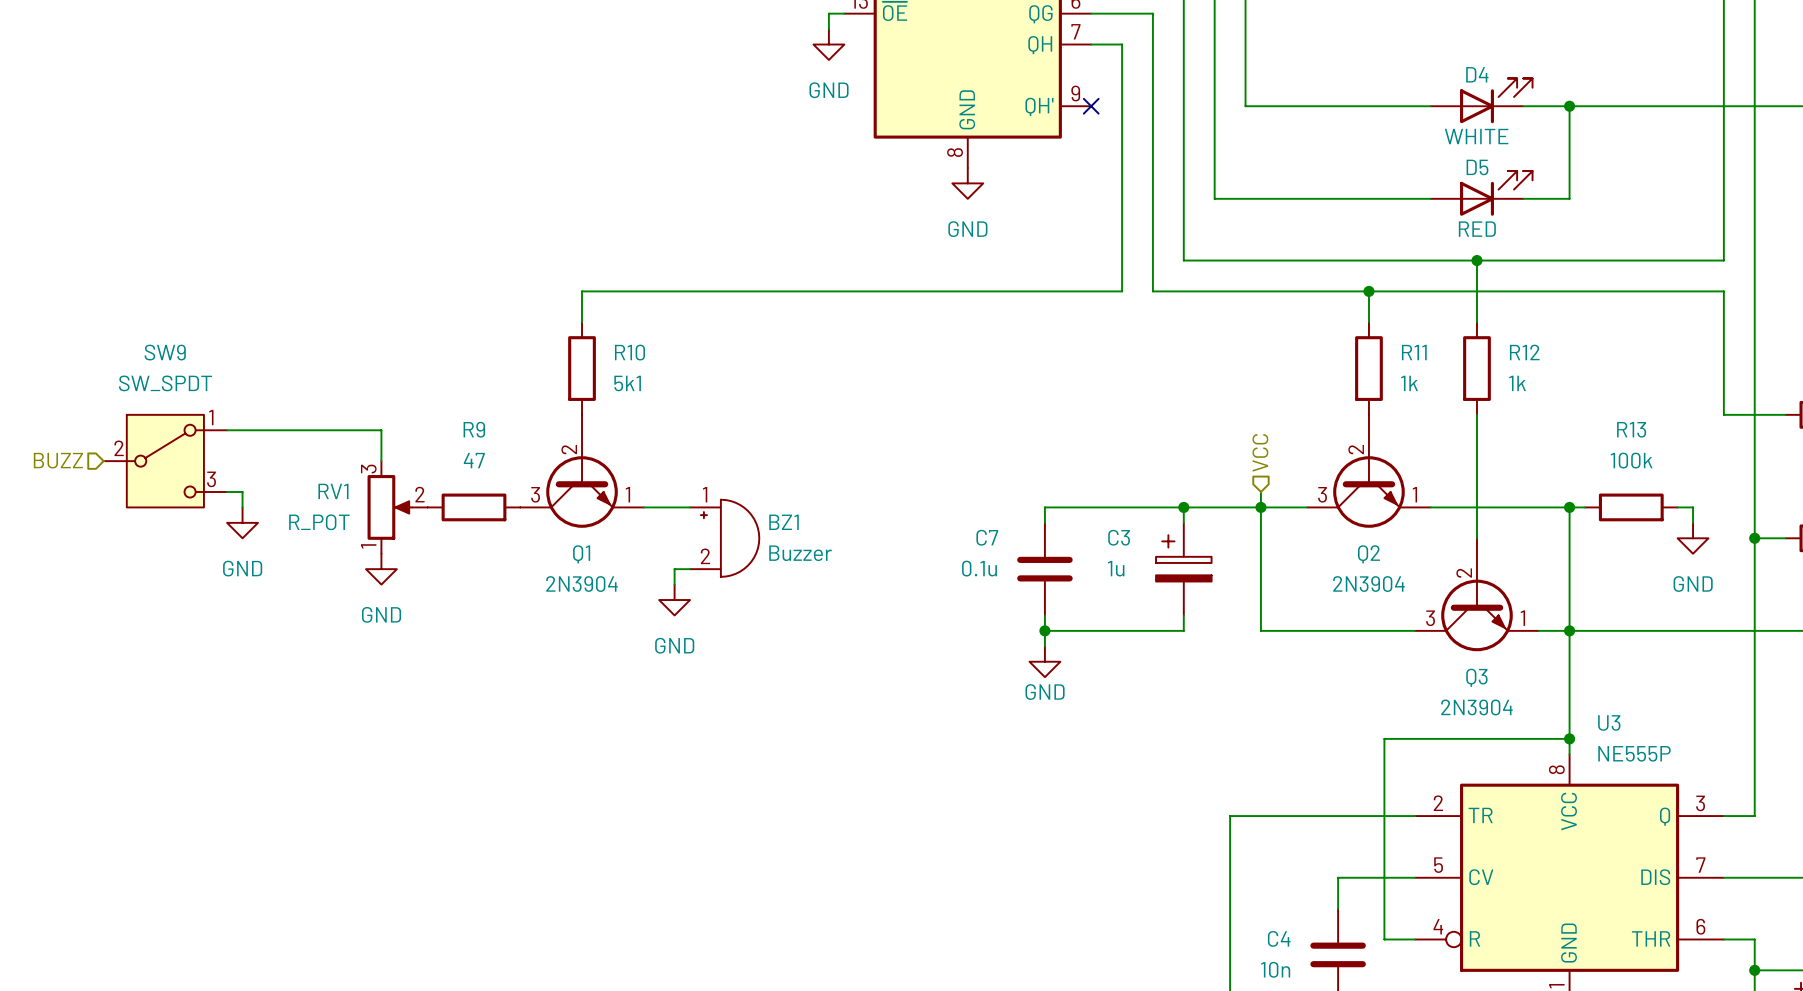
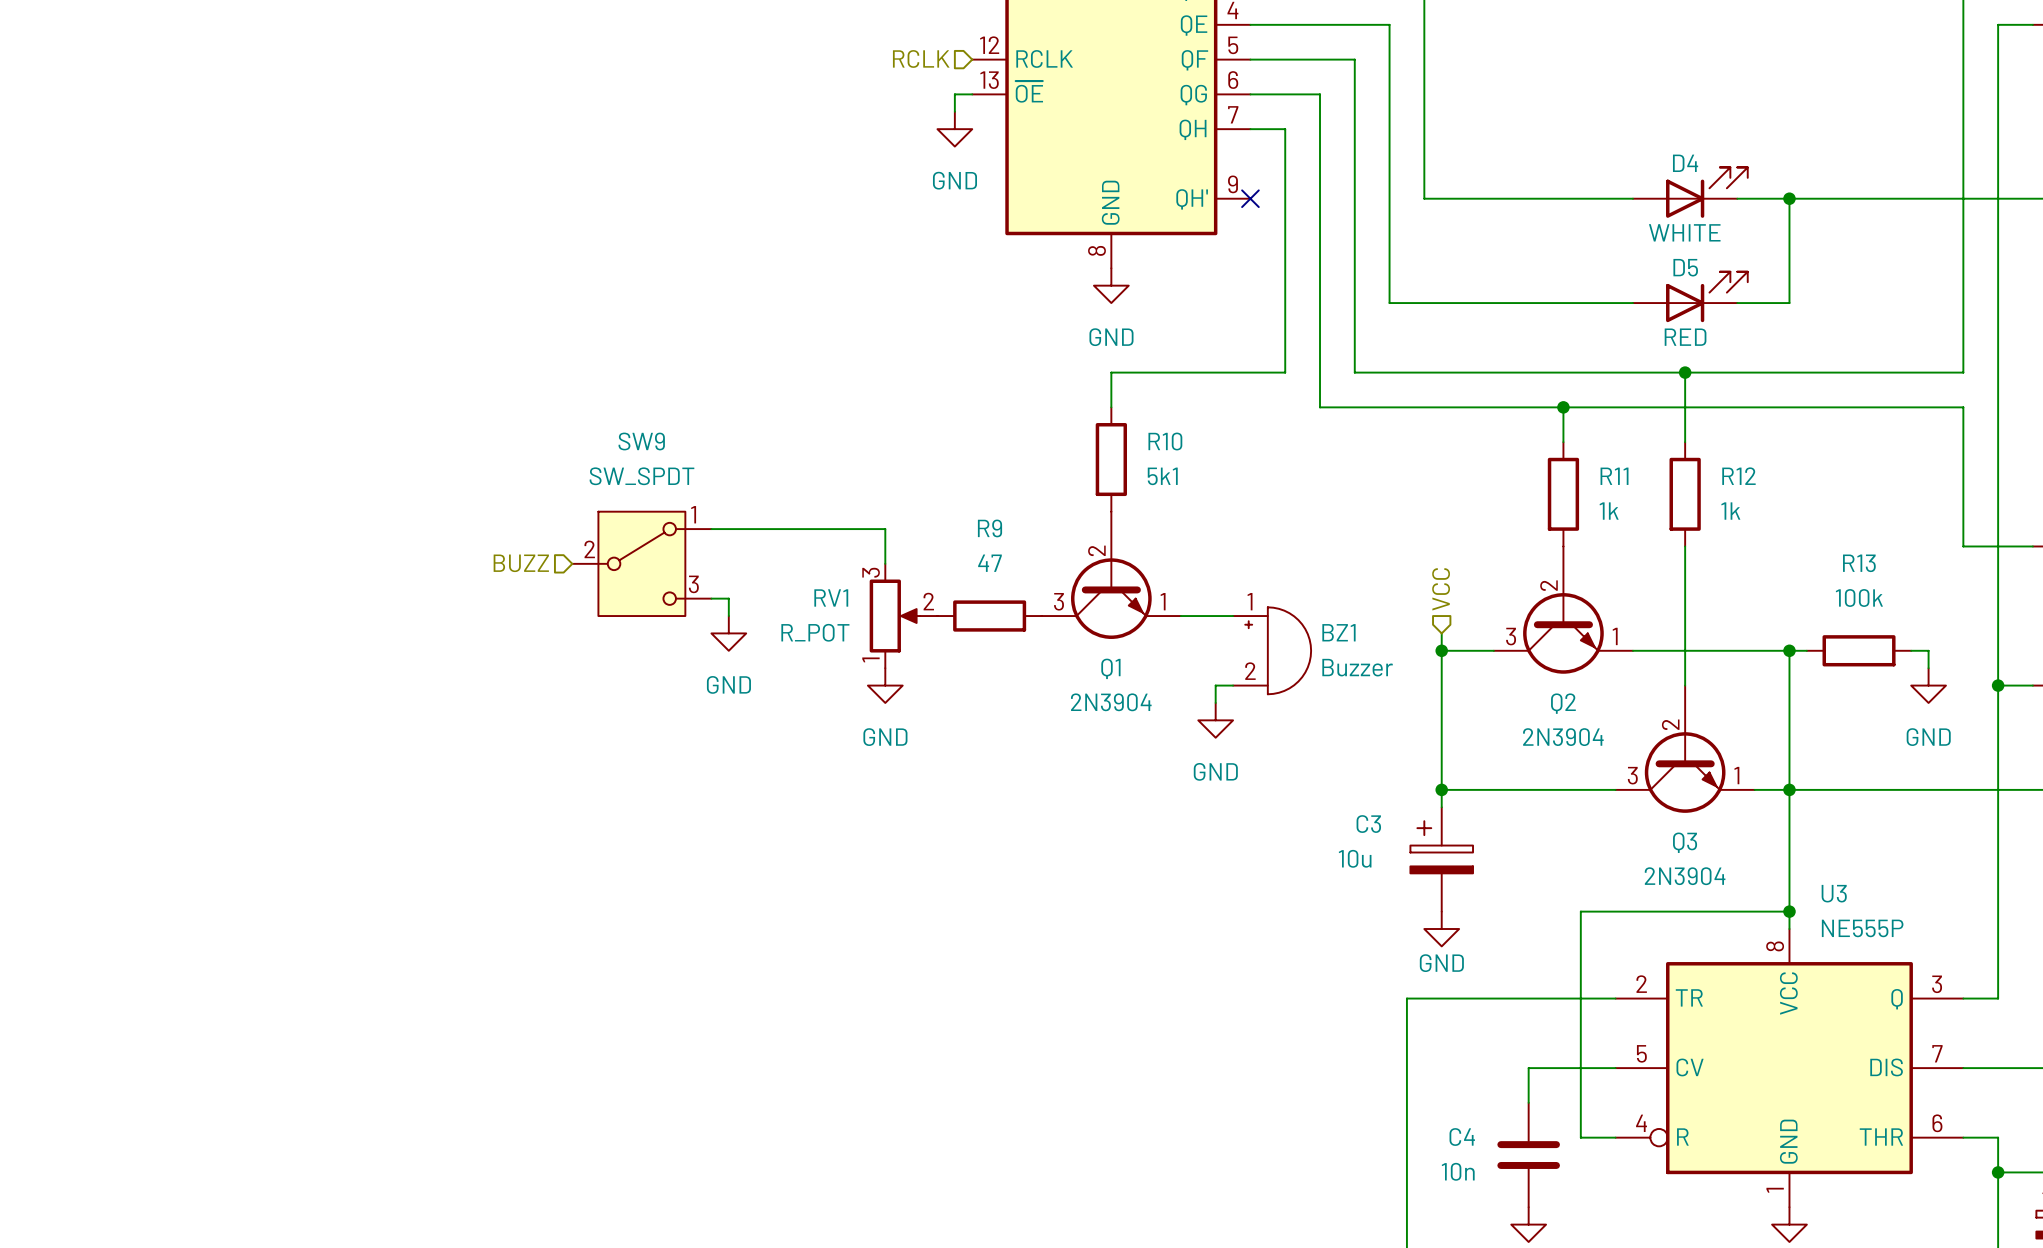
wire: (1122, 260) (1122, 291) (582, 291) (582, 322) -> (1285, 372) (1111, 372) (1111, 407)
R10 position: (582, 368) -> (1111, 459)
wire: none -> (711, 529) (885, 529) (885, 563)
hierarchical label: none -> BUZZ (521, 563)
wire: (227, 430) (381, 430) (381, 461) -> none
hierarchical label: BUZZ (58, 460) -> none
SW9 position: (165, 461) -> (641, 563)
wire: none -> (711, 598) (728, 598) (728, 616)
Q1 position: (582, 471) -> (1111, 575)
wire: none -> (1180, 616) (1233, 616)
wire: (227, 492) (242, 492) (242, 507) -> none
power symbol: none -> GND (728, 633)
RV1 position: (397, 507) -> (903, 616)
R9 position: (474, 507) -> (989, 616)
wire: (643, 507) (690, 507) -> none
wire: (1183, 507) (1183, 522) -> (1441, 789) (1441, 807)
junction: (1183, 507) -> none
wire: (1260, 507) (1044, 507) (1044, 522) -> none
power symbol: GND (242, 522) -> none
BZ1 position: (724, 538) -> (1272, 650)
power symbol: none -> GND (885, 685)
wire: none -> (1233, 685) (1215, 685) (1215, 702)
C3 value: 1u (1116, 568) -> 10u (1355, 858)
power symbol: GND (381, 569) -> none
wire: (690, 569) (674, 569) (674, 584) -> none
C7: 0.1u (1044, 569) -> none
C3 position: (1183, 569) -> (1441, 859)
power symbol: GND (674, 600) -> none
wire: (1044, 615) (1044, 646) -> none
wire: (1183, 615) (1183, 630) (1044, 630) -> none
junction: (1044, 630) -> none
junction: none -> (1441, 789)
power symbol position: GND (1044, 661) -> GND (1215, 720)
power symbol text position: GND (1045, 692) -> GND (1215, 771)
power symbol: none -> GND (1441, 929)

